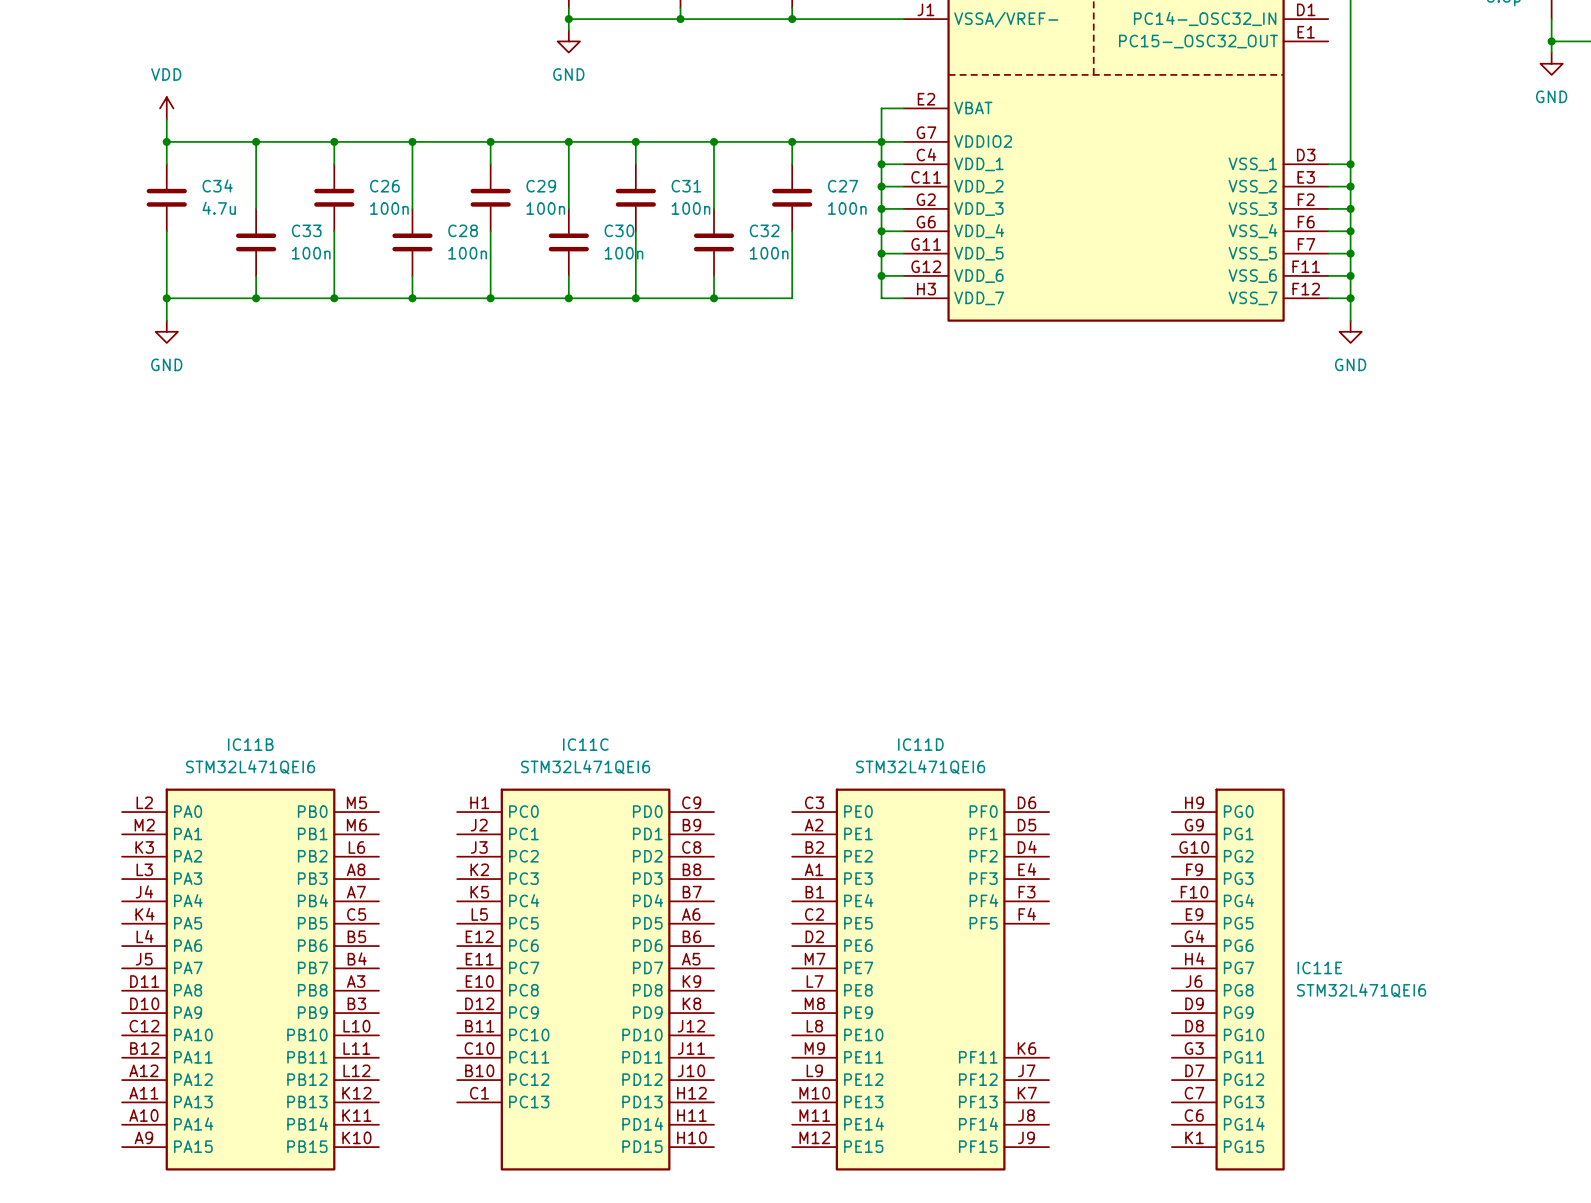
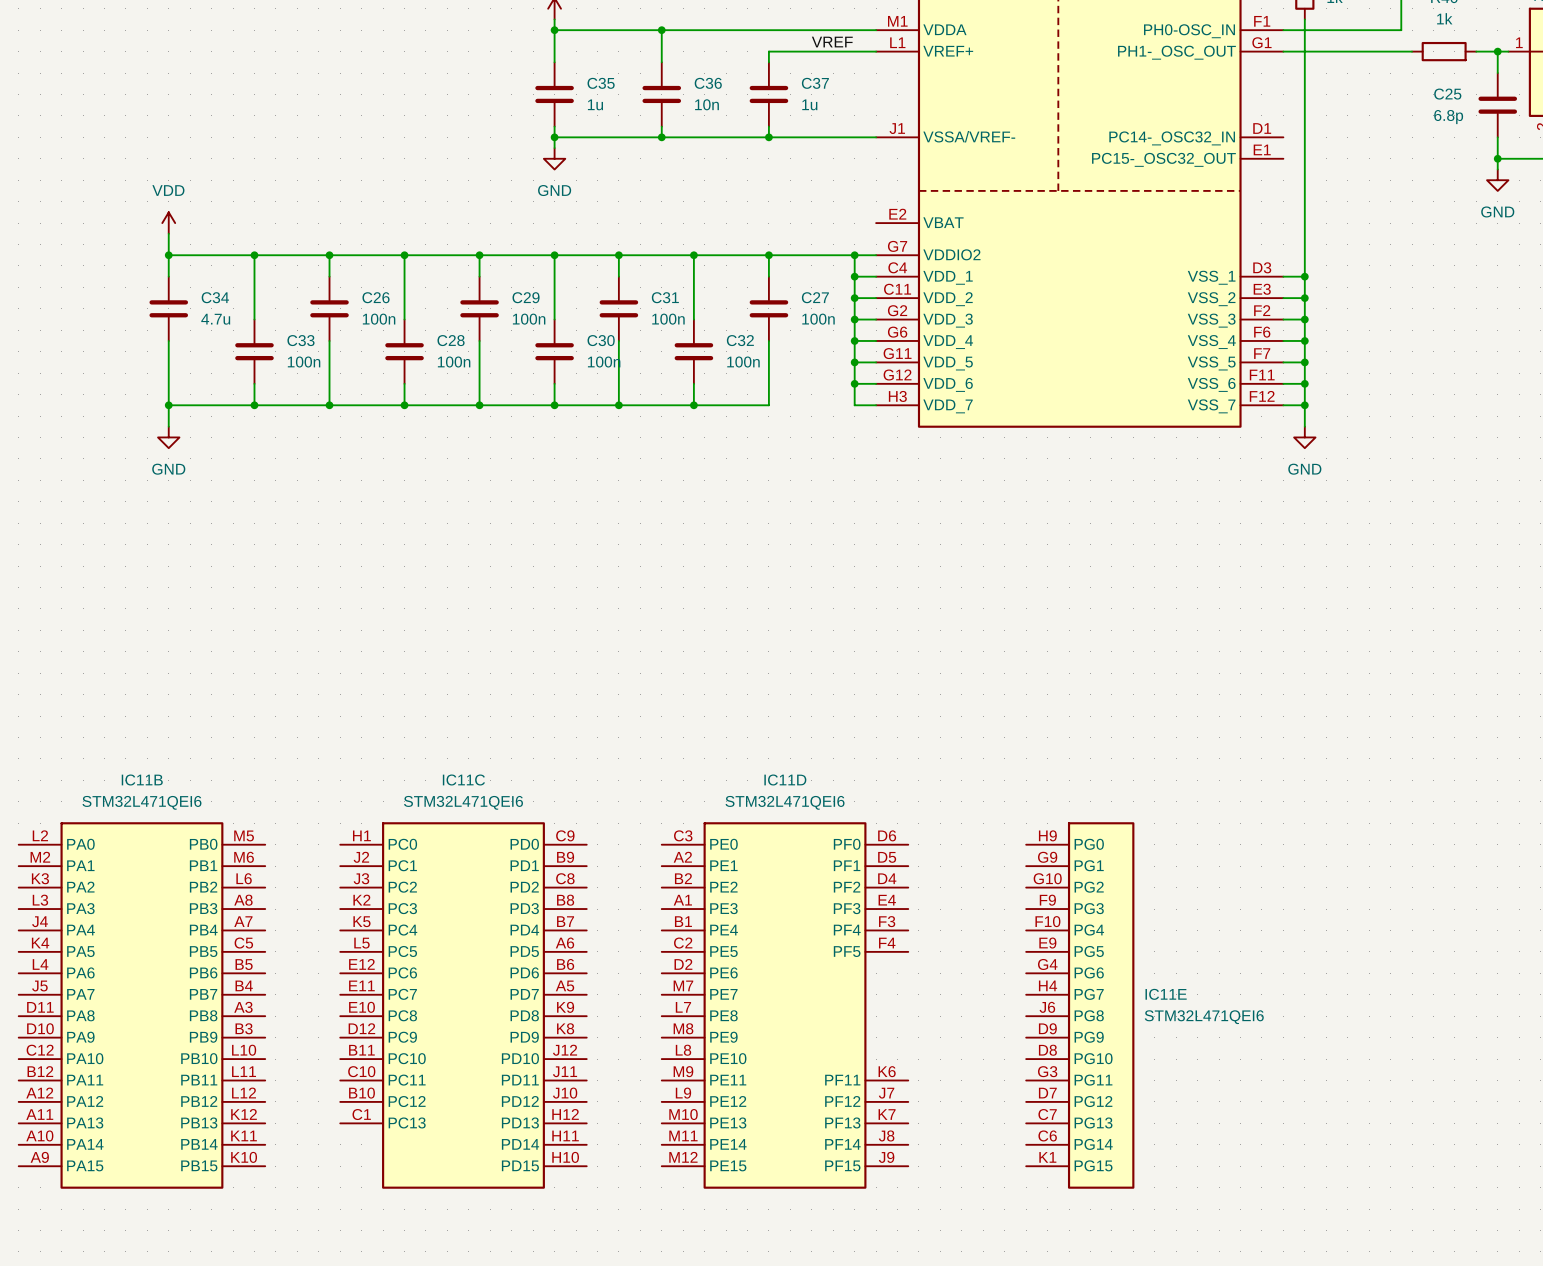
wire: (903, 108) (881, 108) (881, 141) -> none
IC11B position: (250, 979) -> (141, 1005)
IC11C position: (585, 979) -> (463, 1005)
IC11D position: (920, 979) -> (785, 1005)
IC11E position: (1228, 979) -> (1080, 1005)

